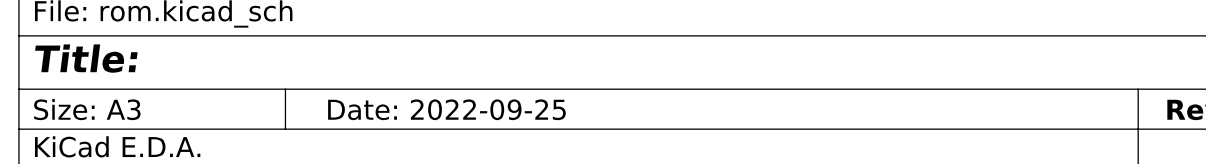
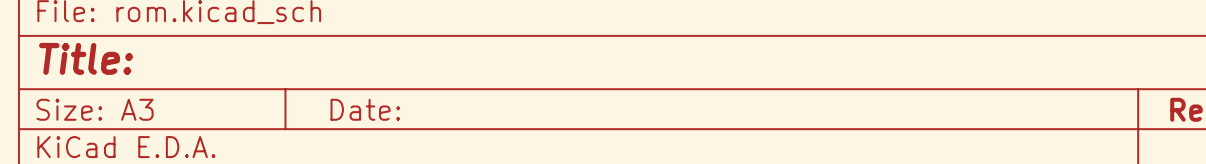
title block: Date: 2022-09-25 (446, 109) -> Date: (365, 109)

